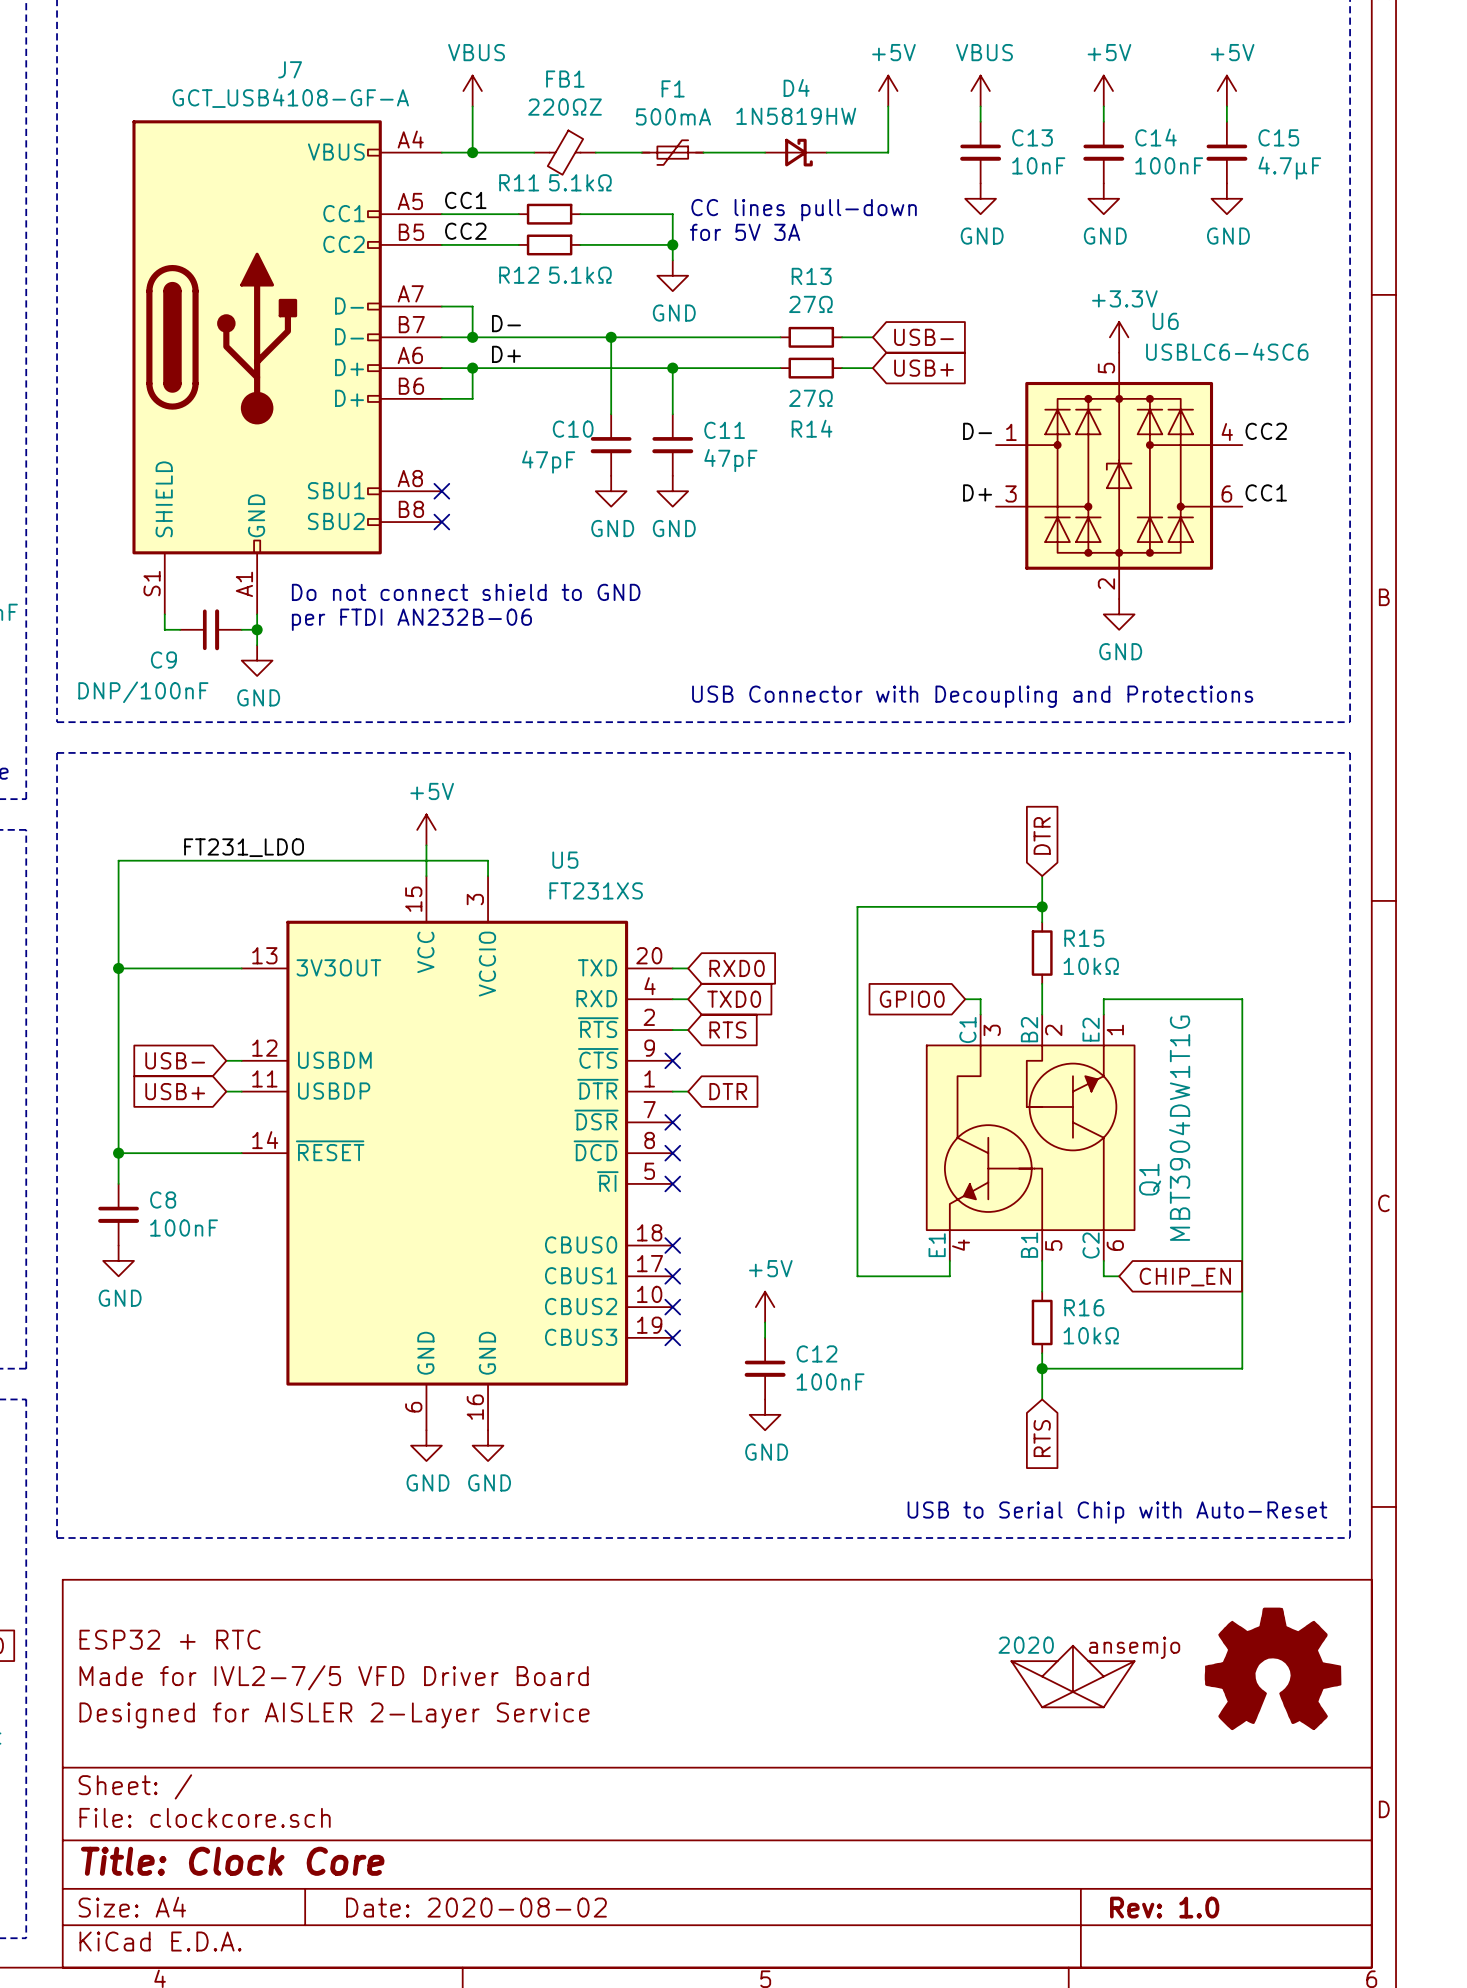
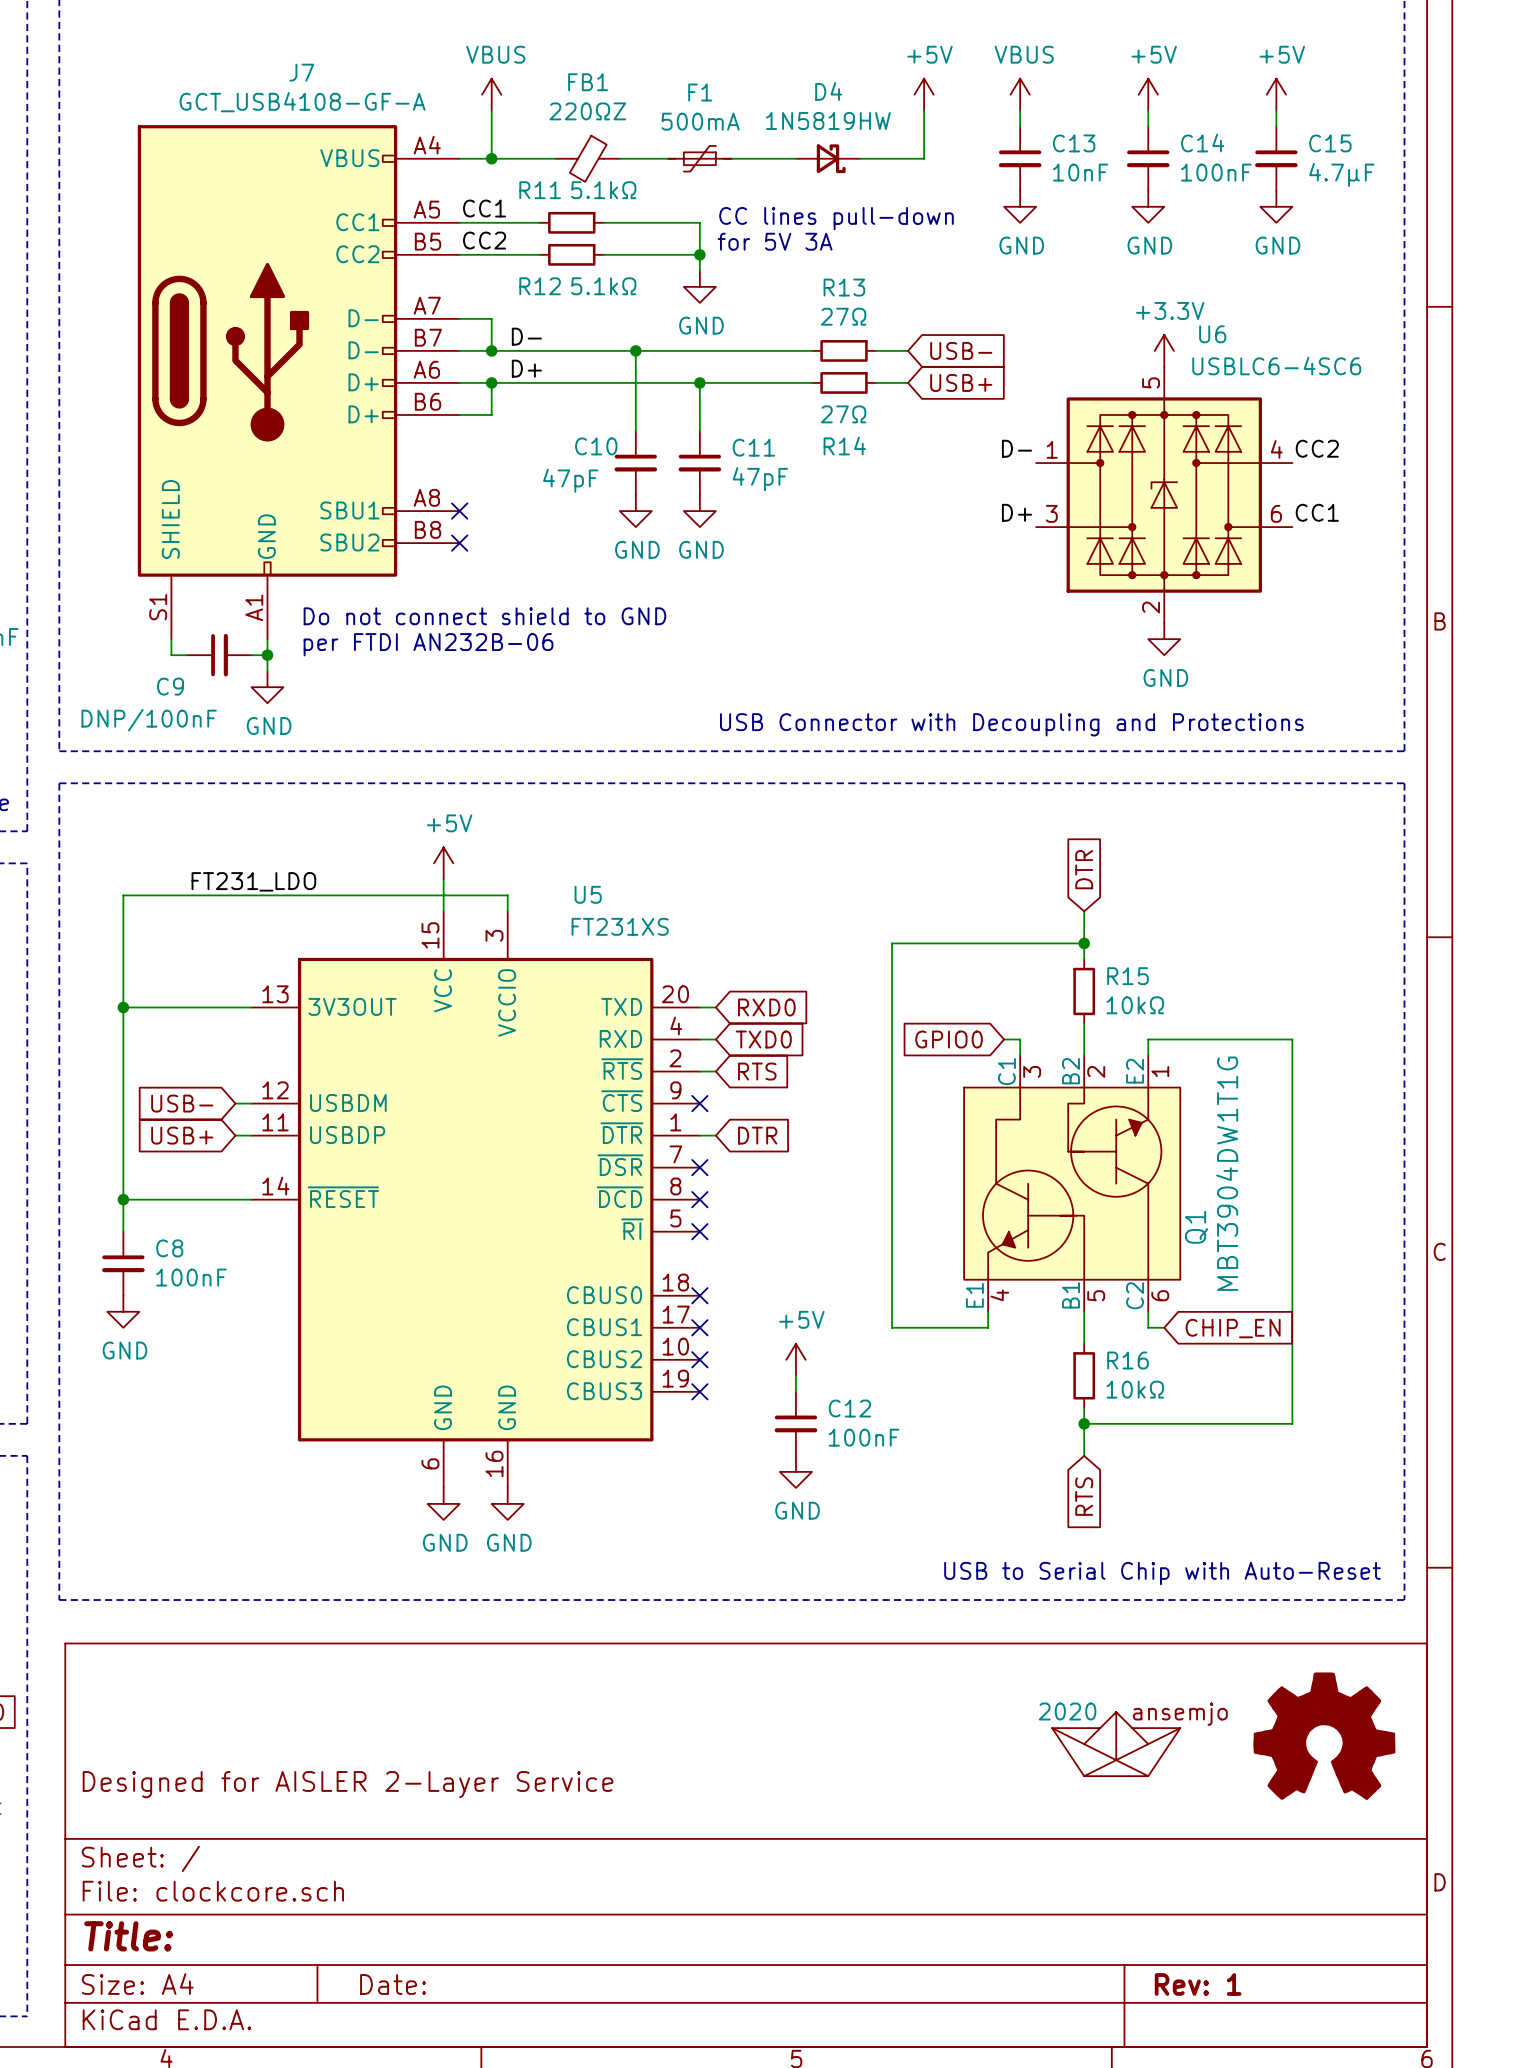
title block: ESP32 + RTC (170, 1639) -> none
title block: Made for IVL2-7/5 VFD Driver Board (334, 1677) -> none
title block: Title: Clock Core (232, 1861) -> Title: (128, 1936)
title block: Date: 2020-08-02 (476, 1907) -> Date: (393, 1984)
title block: Rev: 1.0 (1164, 1907) -> Rev: 1 (1198, 1984)

